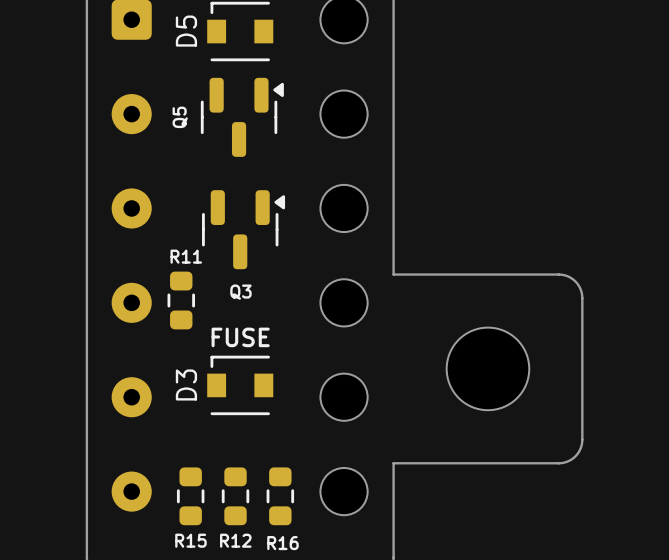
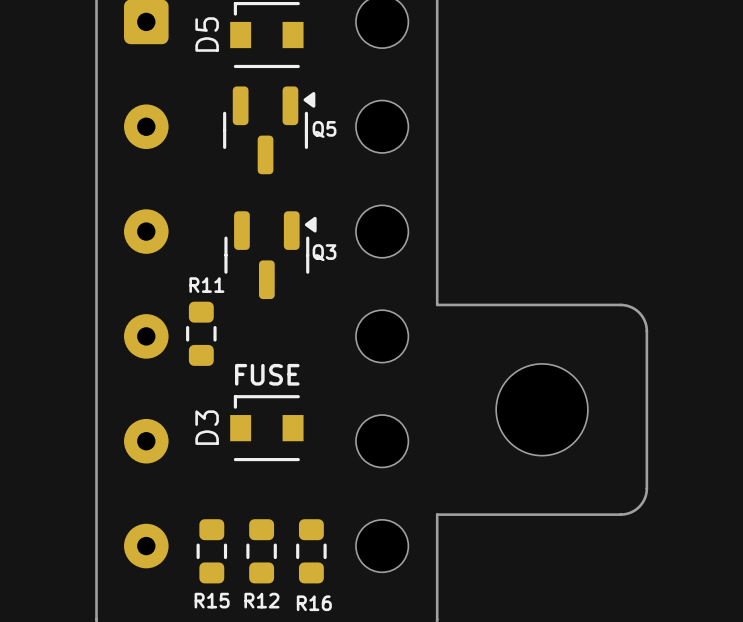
Q5 name rotation: 0° (180, 117) -> 90° clockwise (324, 129)
Q5 name position: Q5 (180, 117) -> Q5 (324, 129)
Q3 name position: Q3 (240, 292) -> Q3 (324, 252)

